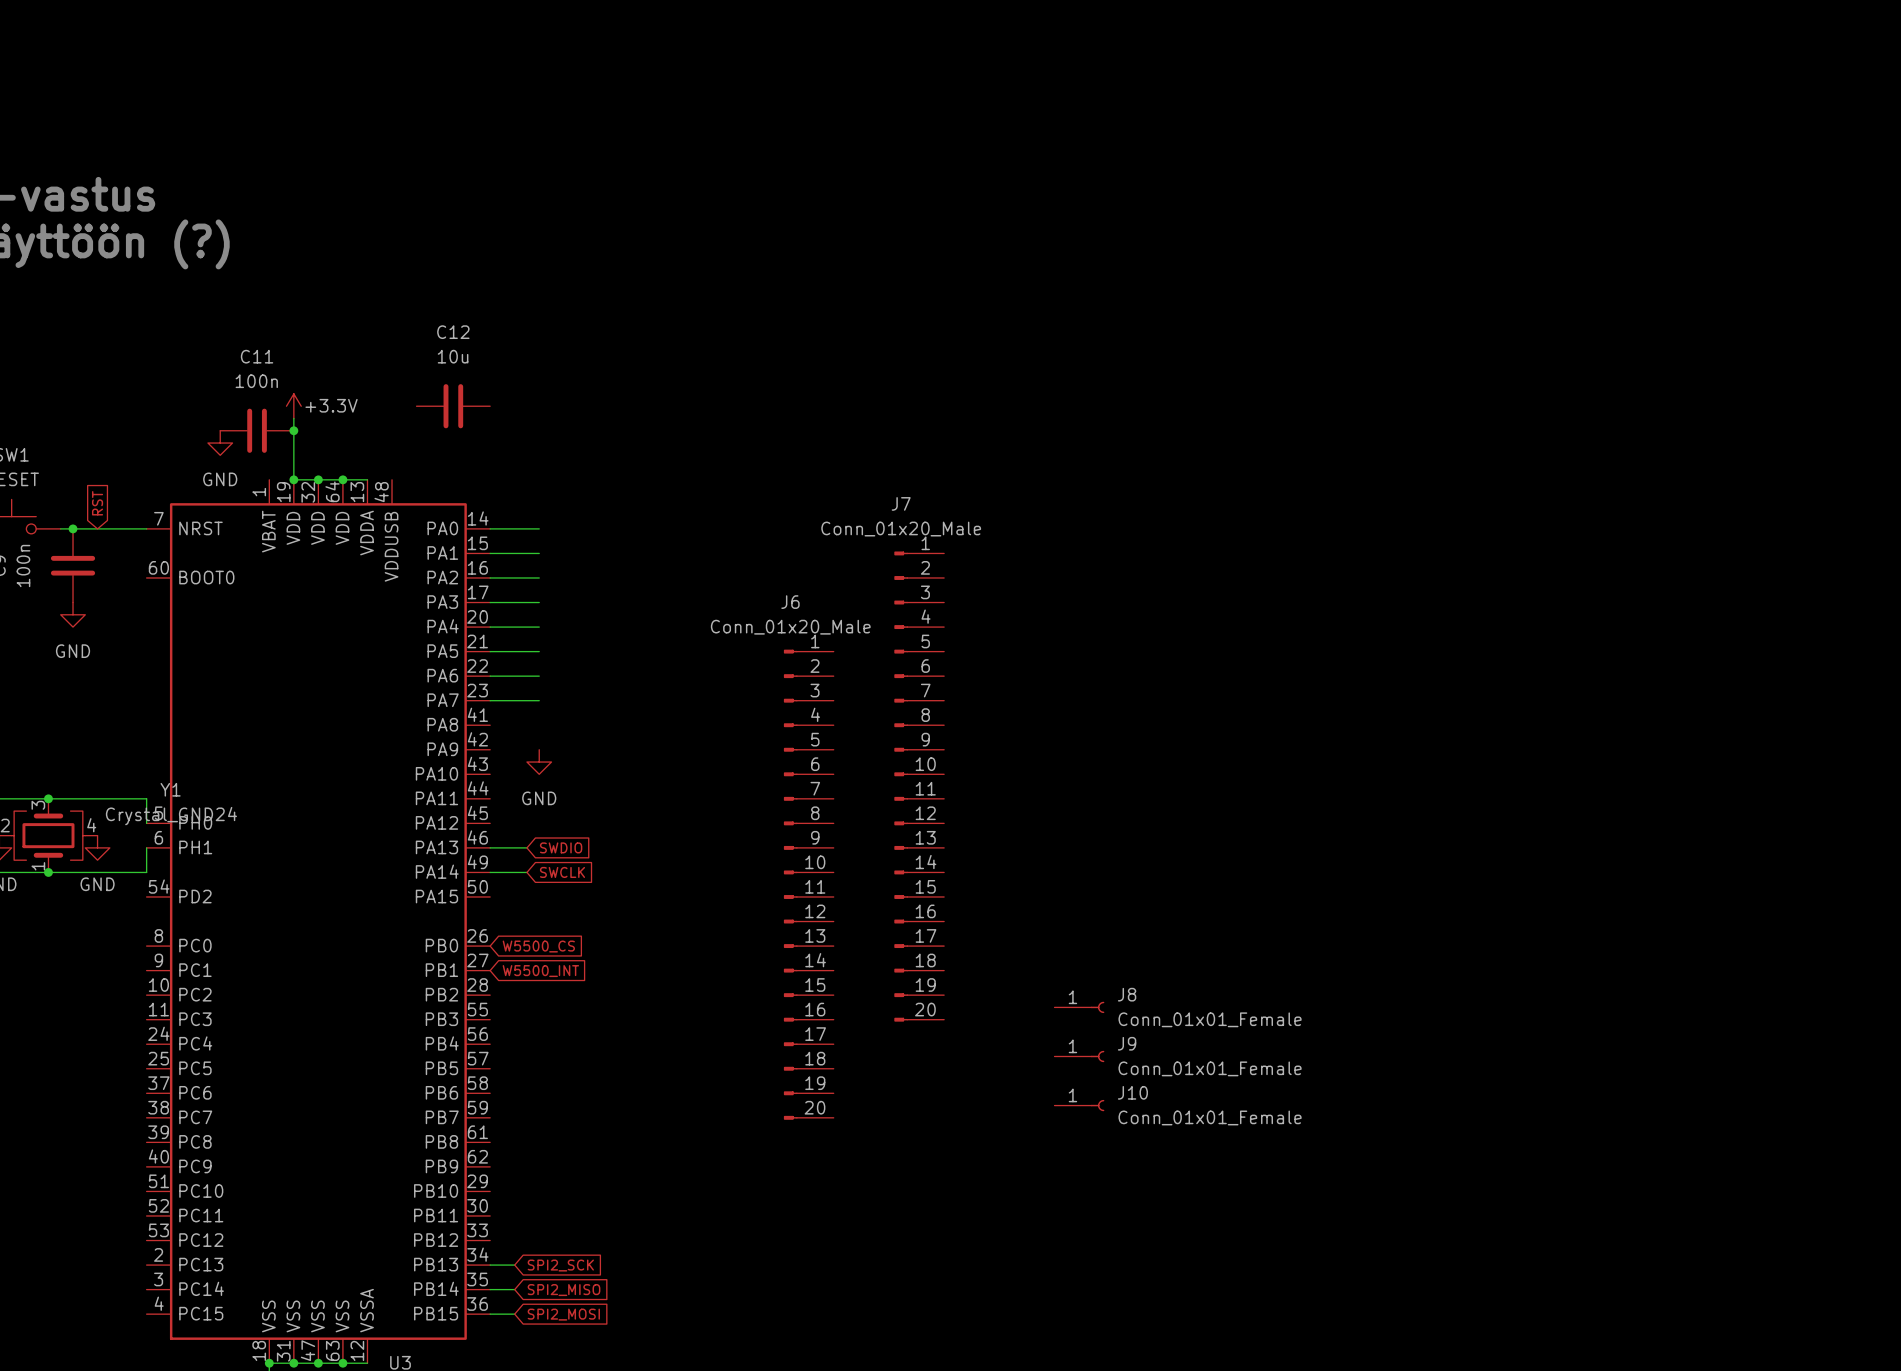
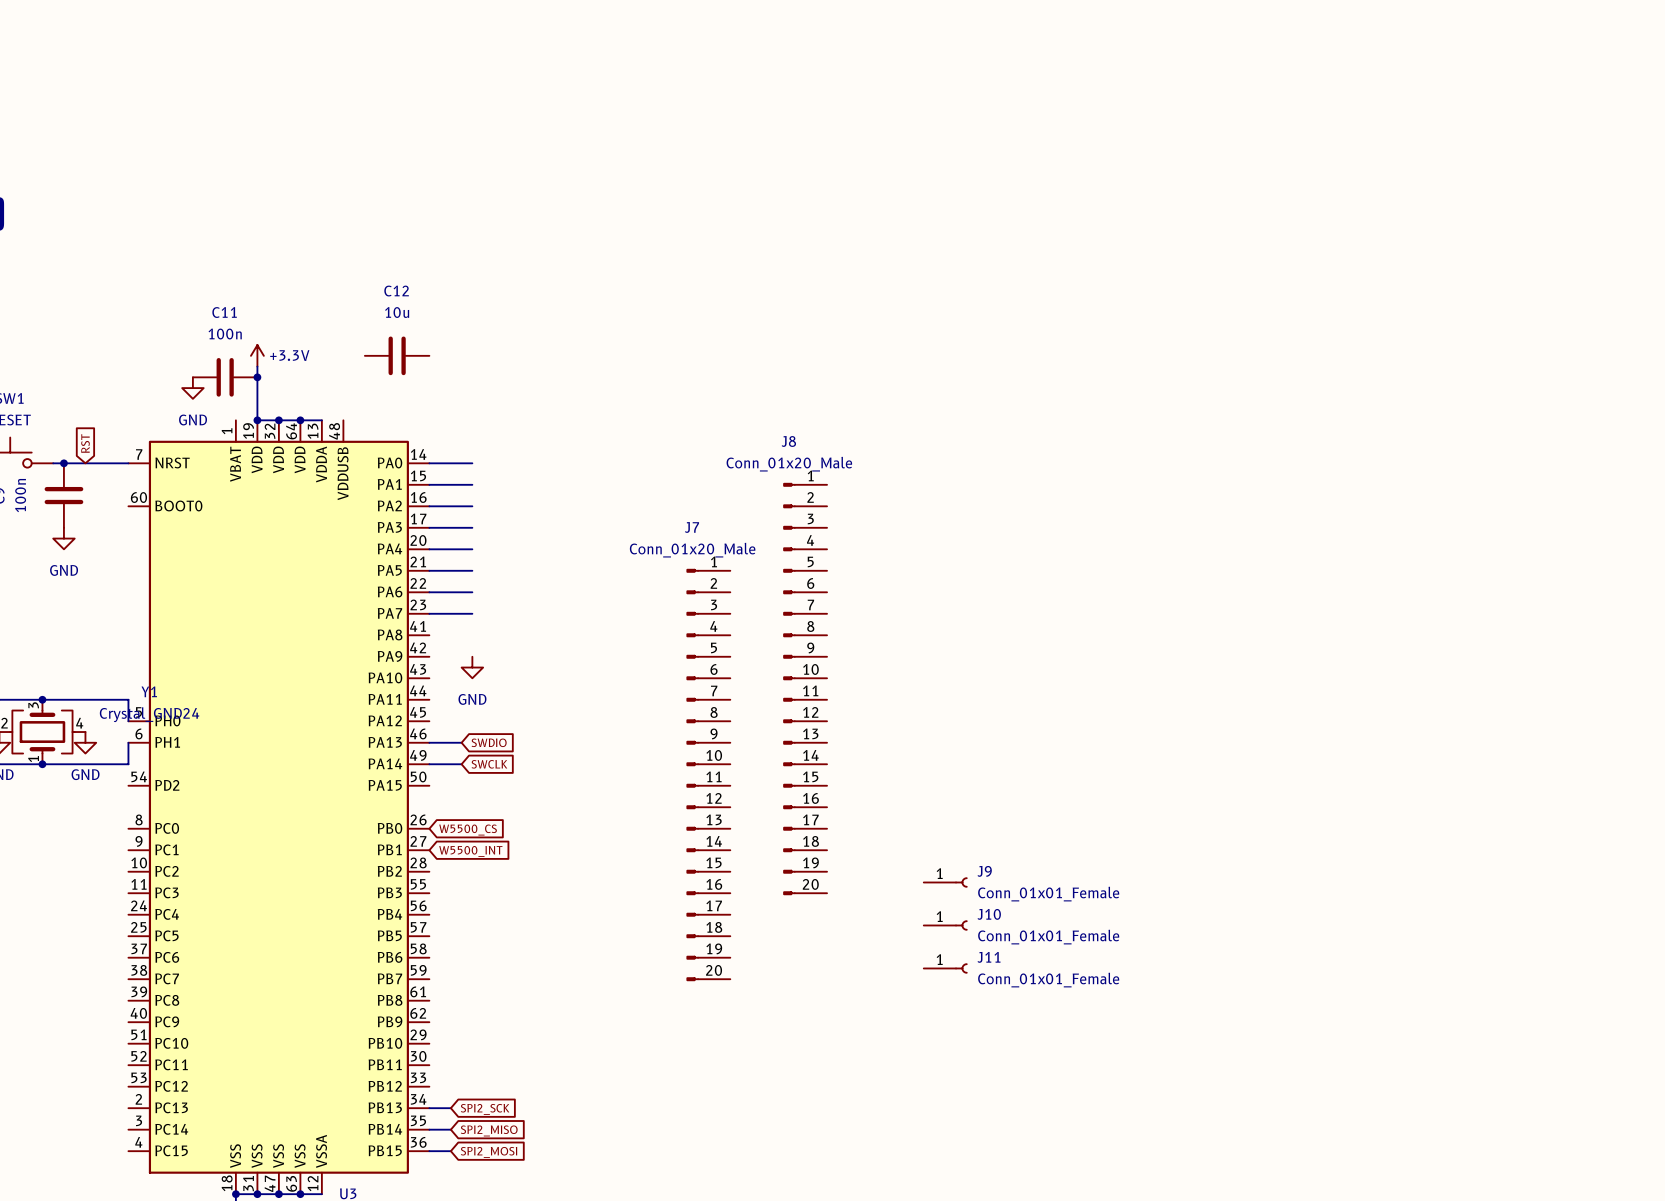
J7 name: J7 (901, 503) -> J8 (788, 441)
J6 name: J6 (790, 602) -> J7 (691, 527)
J8 name: J8 (1127, 994) -> J9 (984, 871)
J9 name: J9 (1127, 1043) -> J10 (989, 914)
J10 name: J10 (1132, 1092) -> J11 (989, 957)

